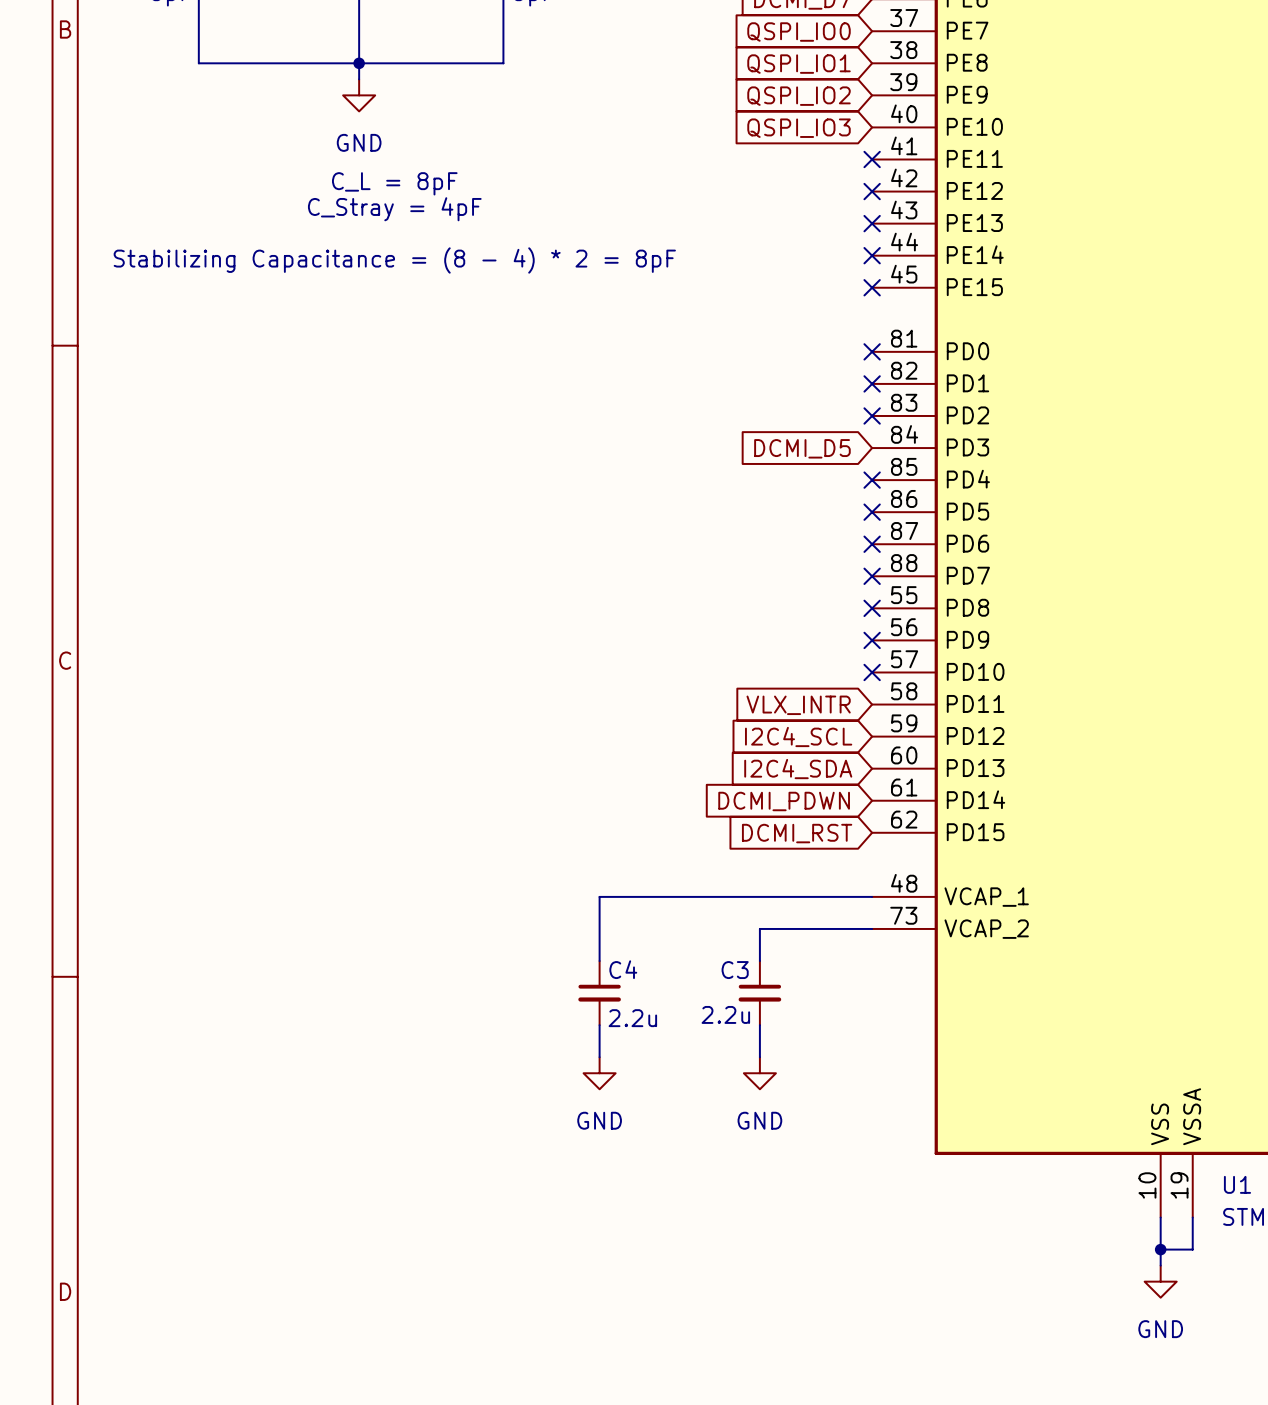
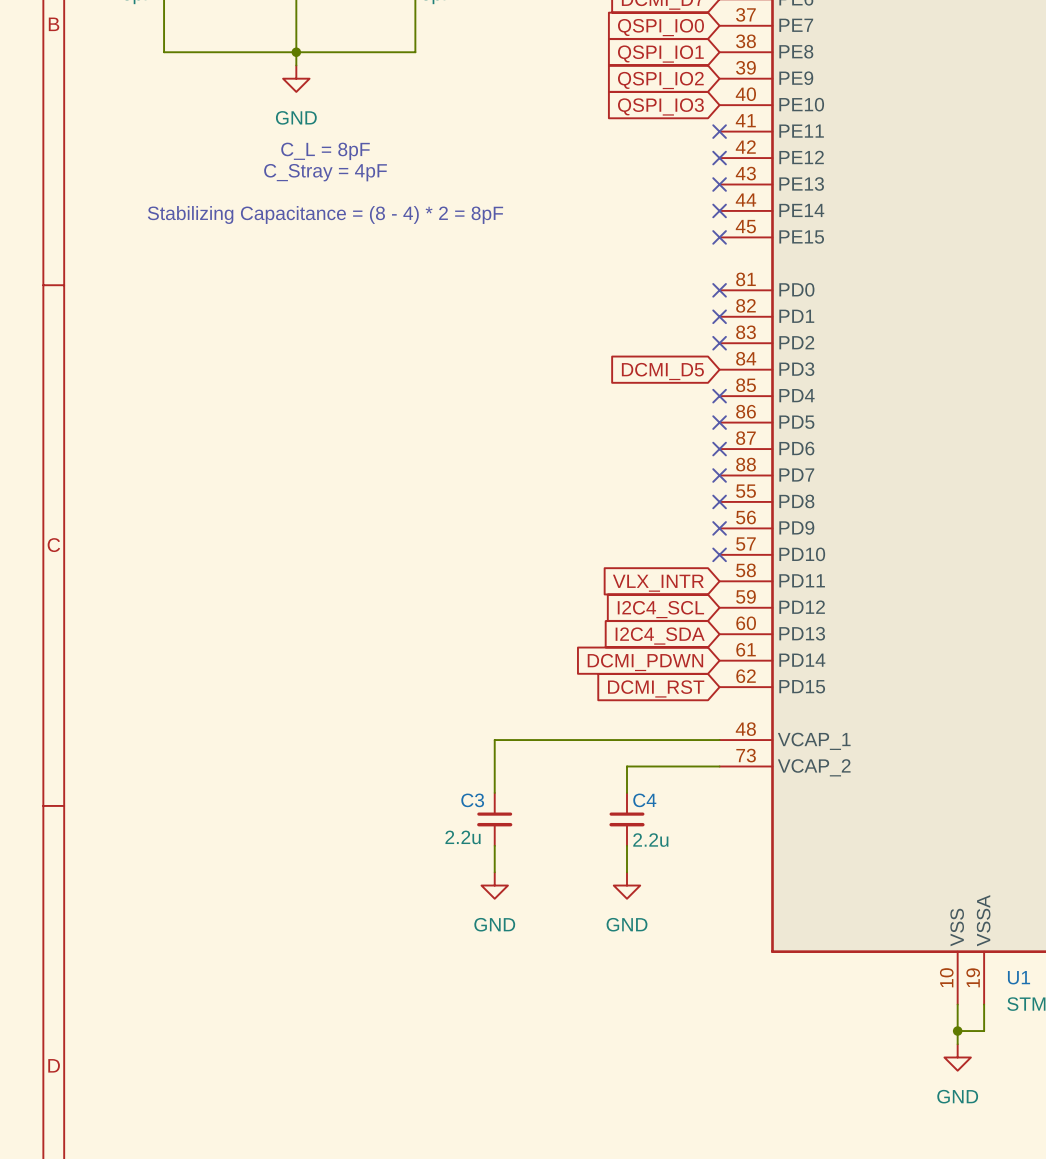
C4 name: C4 (623, 969) -> C3 (472, 800)
C3 name: C3 (735, 970) -> C4 (644, 800)
C3 value position: 2.2u (725, 1014) -> 2.2u (650, 840)
C4 value position: 2.2u (632, 1018) -> 2.2u (463, 837)

